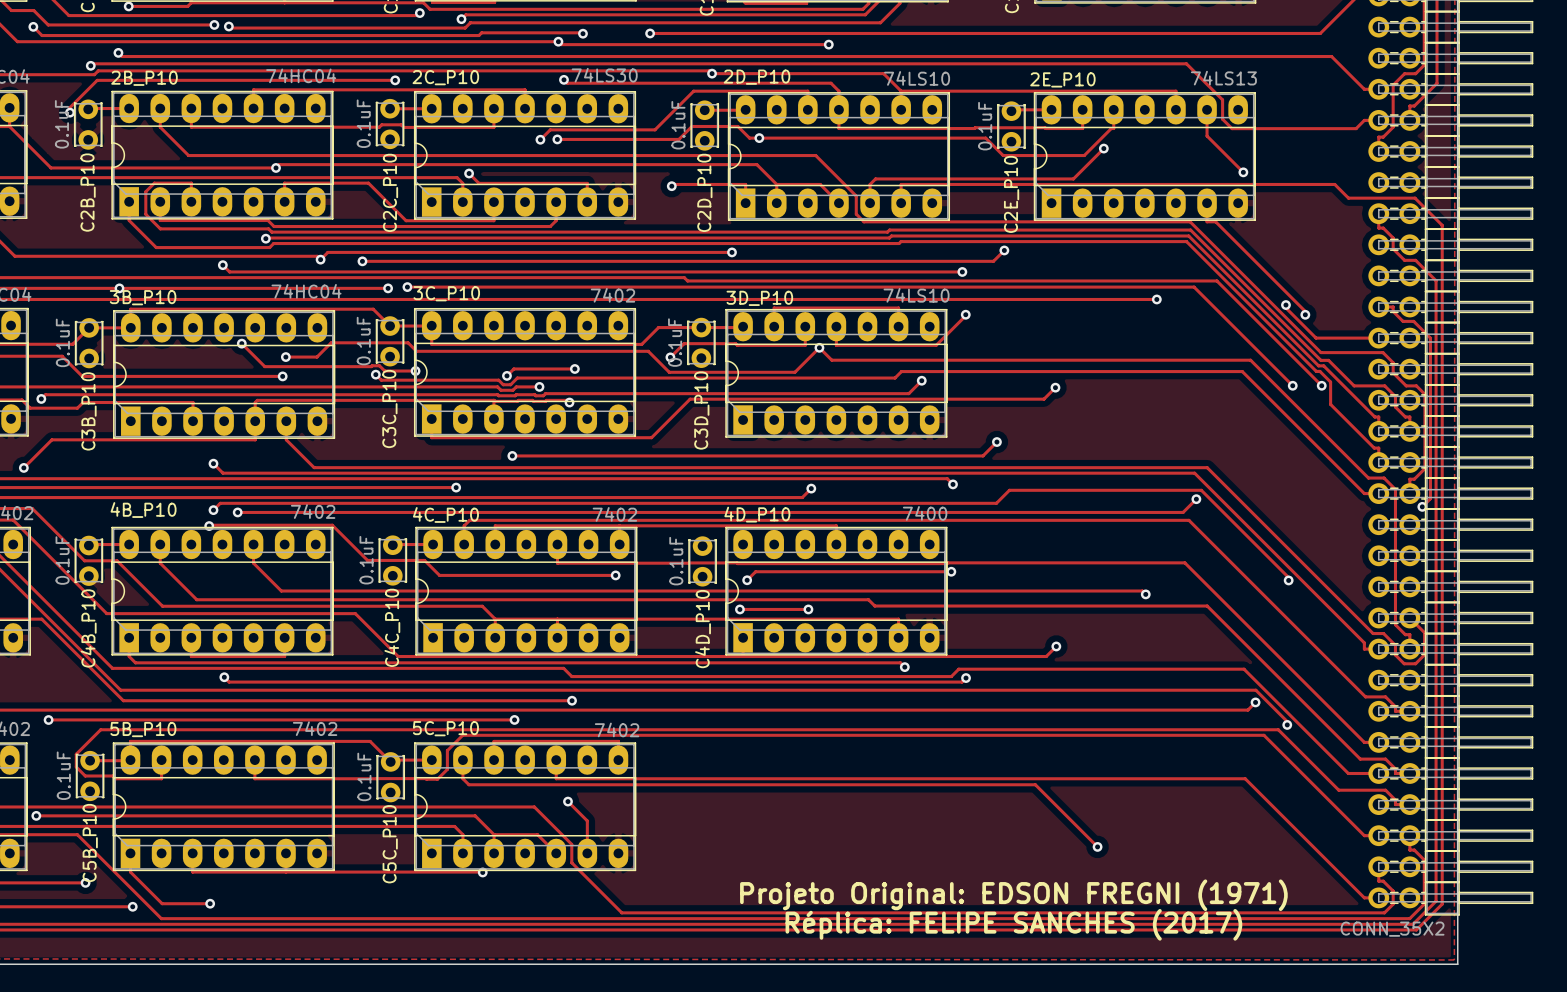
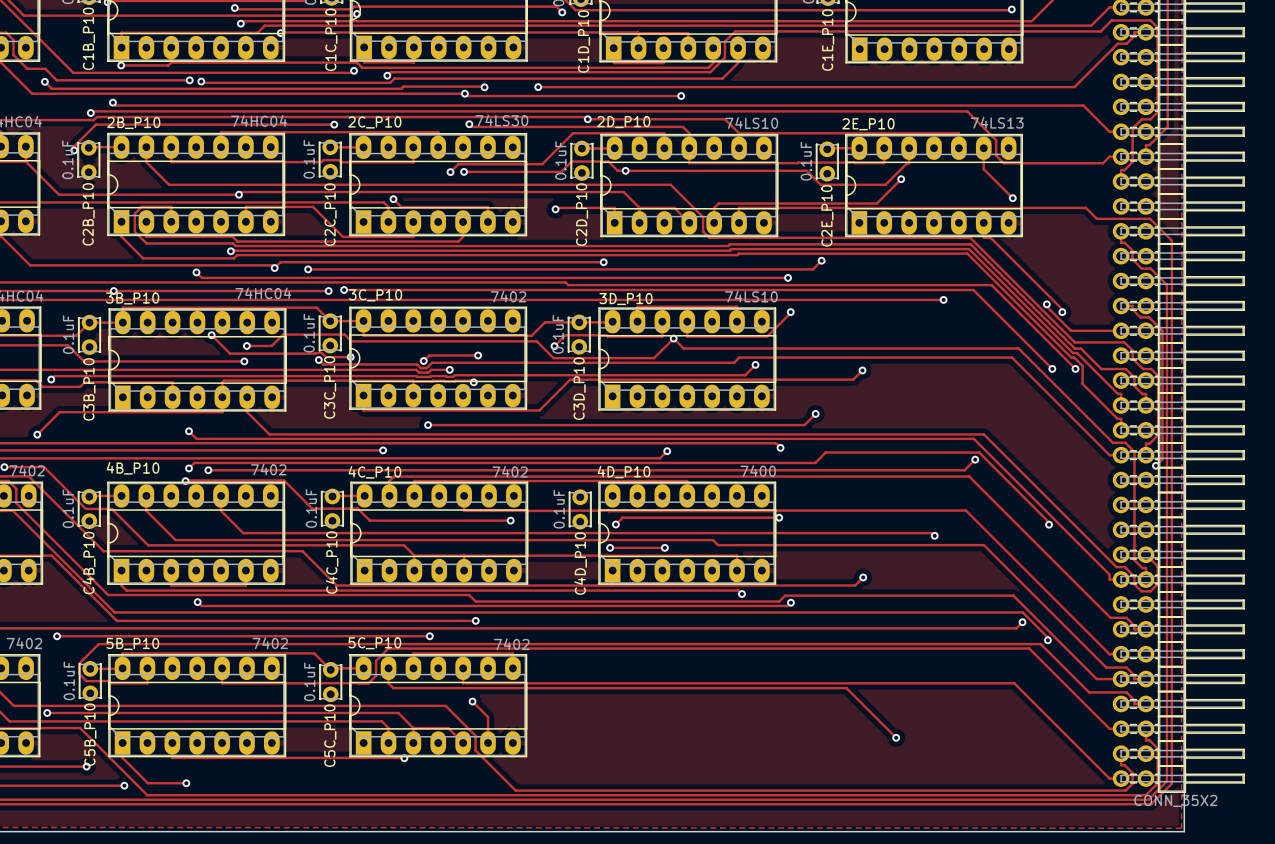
text: Projeto Original: EDSON FREGNI (1971) (1013, 895) -> none
text: Réplica: FELIPE SANCHES (2017) (1013, 924) -> none
part value position: CONN_35X2 (1392, 929) -> CONN_35X2 (1175, 800)

